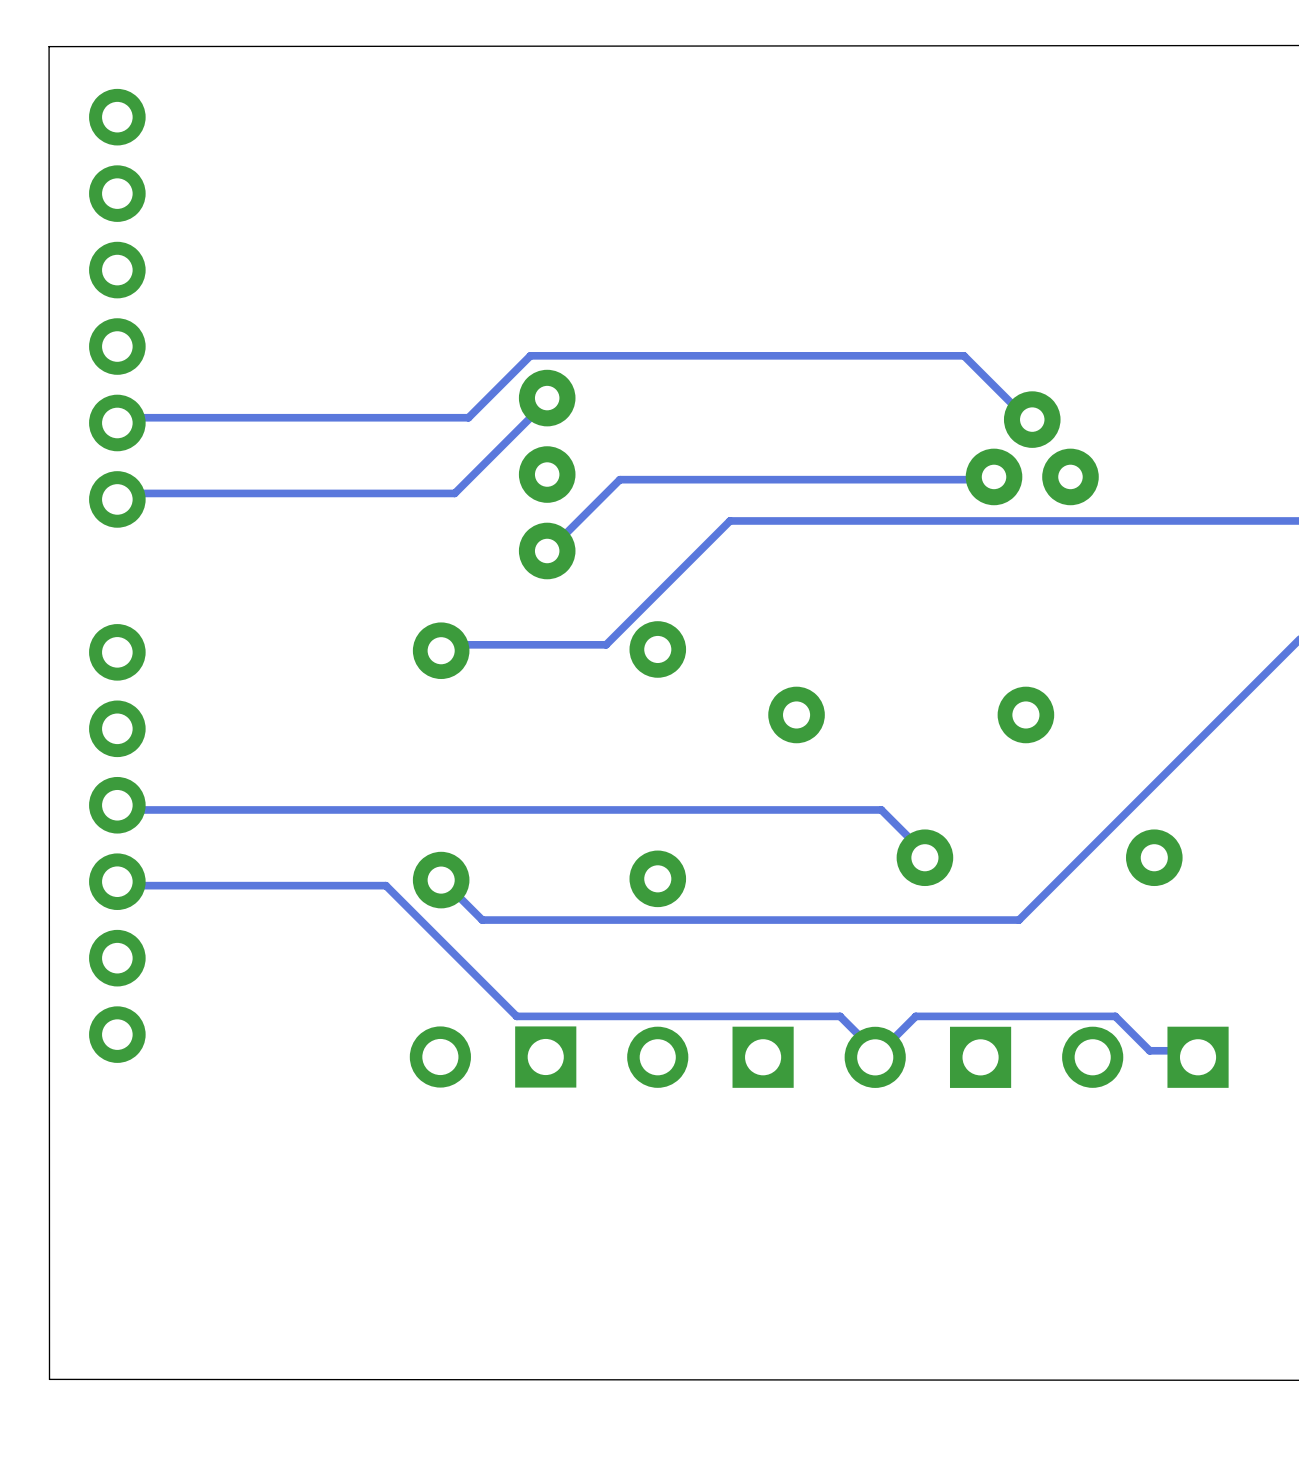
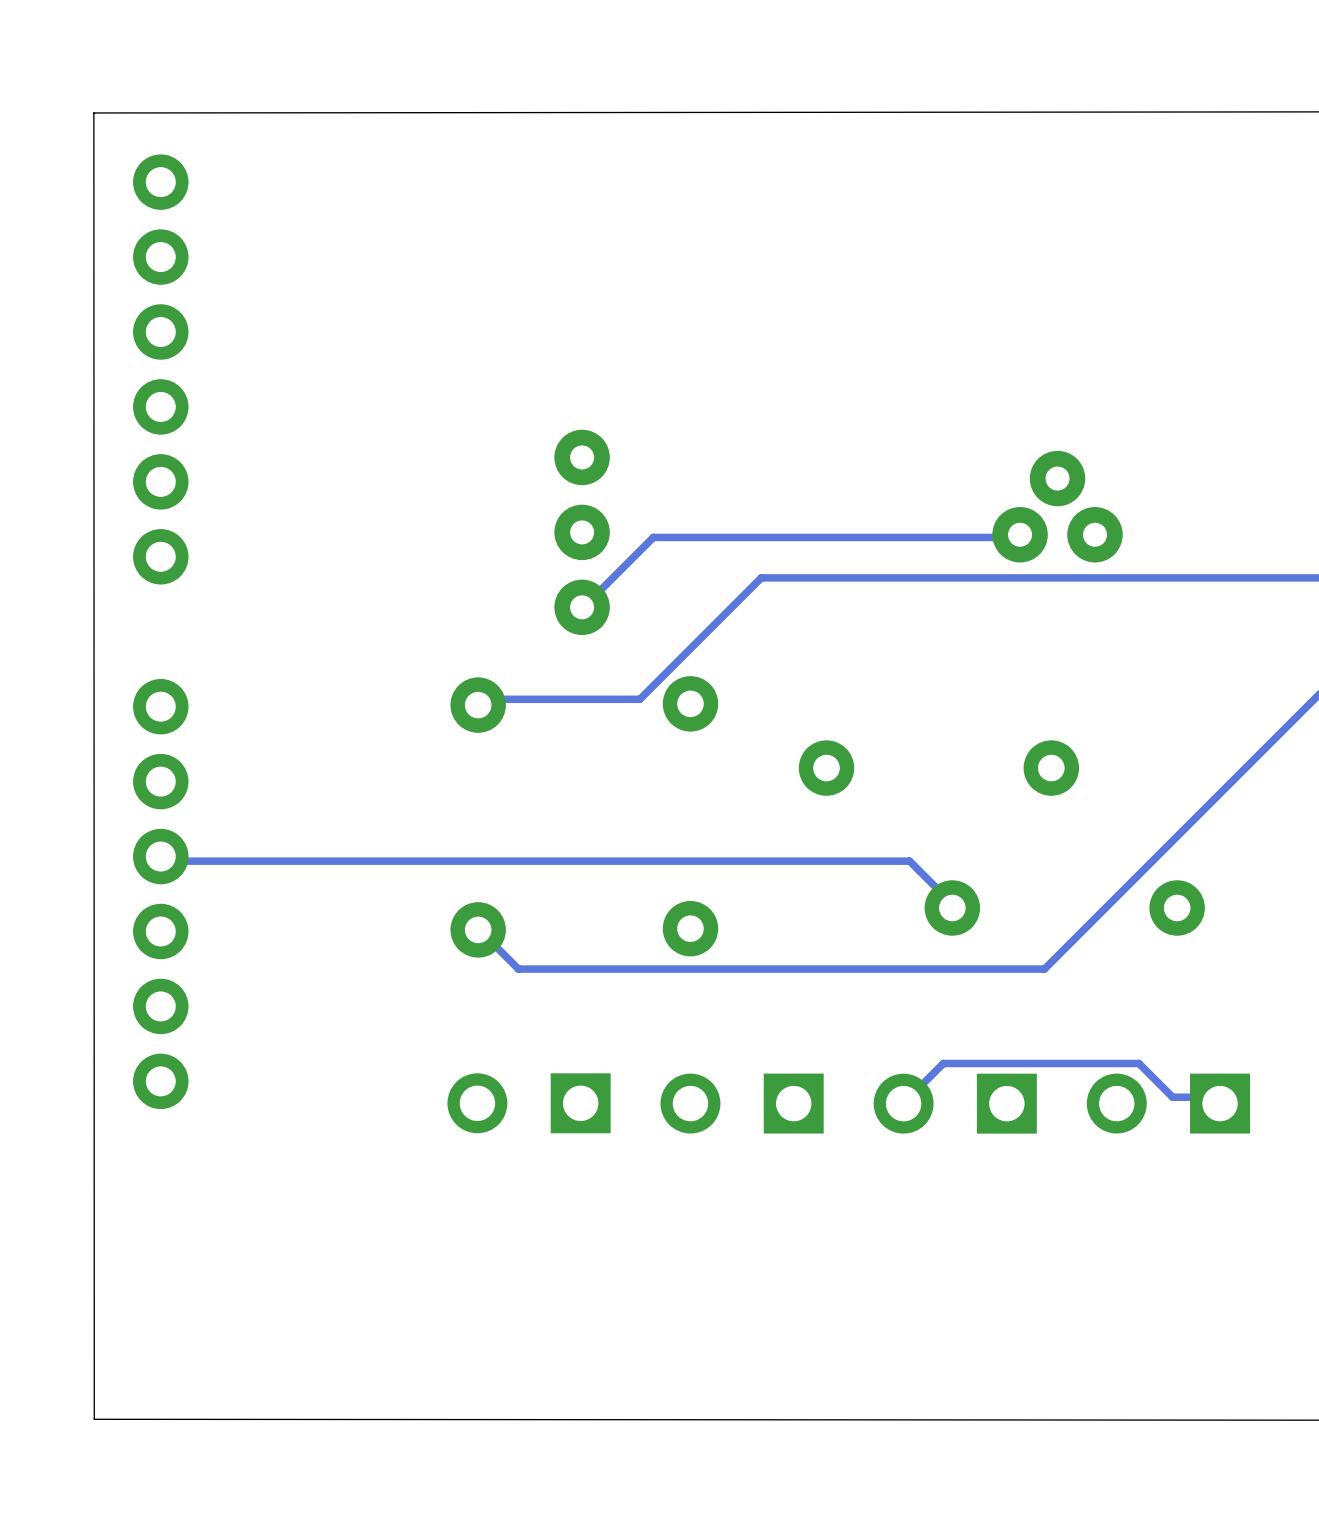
track: (547, 398) (544, 403) (454, 493) (117, 493) (117, 499) -> none
track: (1032, 419) (1025, 417) (963, 355) (530, 355) (468, 417) (117, 417) (117, 422) -> none
track: (117, 881) (117, 885) (385, 885) (516, 1016) (840, 1016) (874, 1050) (875, 1057) -> none

